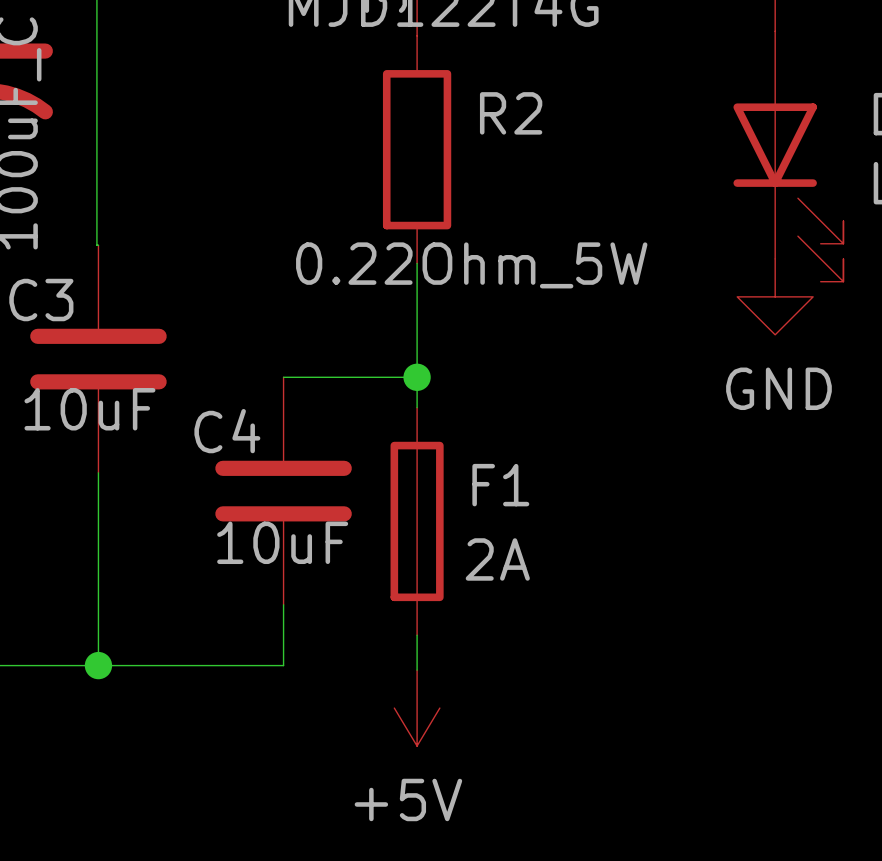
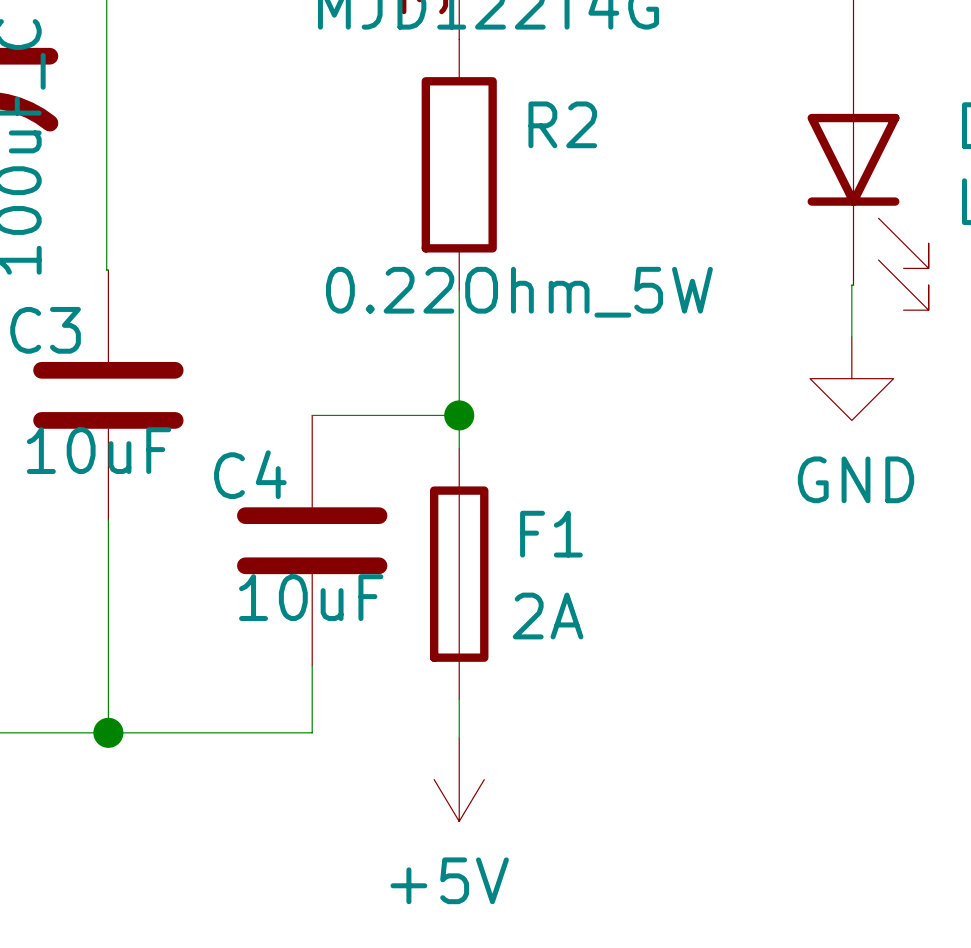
wire: none -> (853, 285) (851, 285) (851, 336)
power symbol position: GND (775, 296) -> GND (851, 378)

